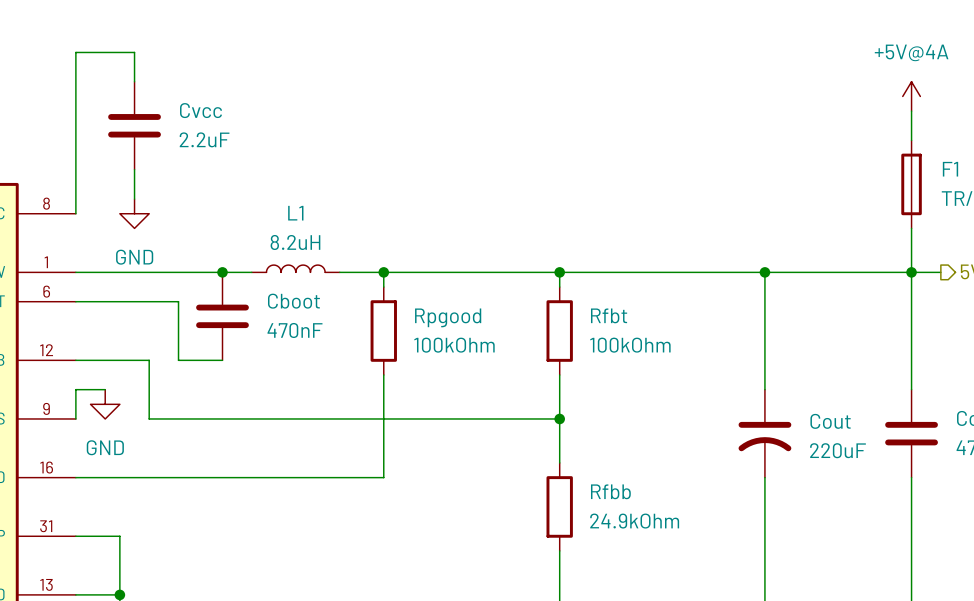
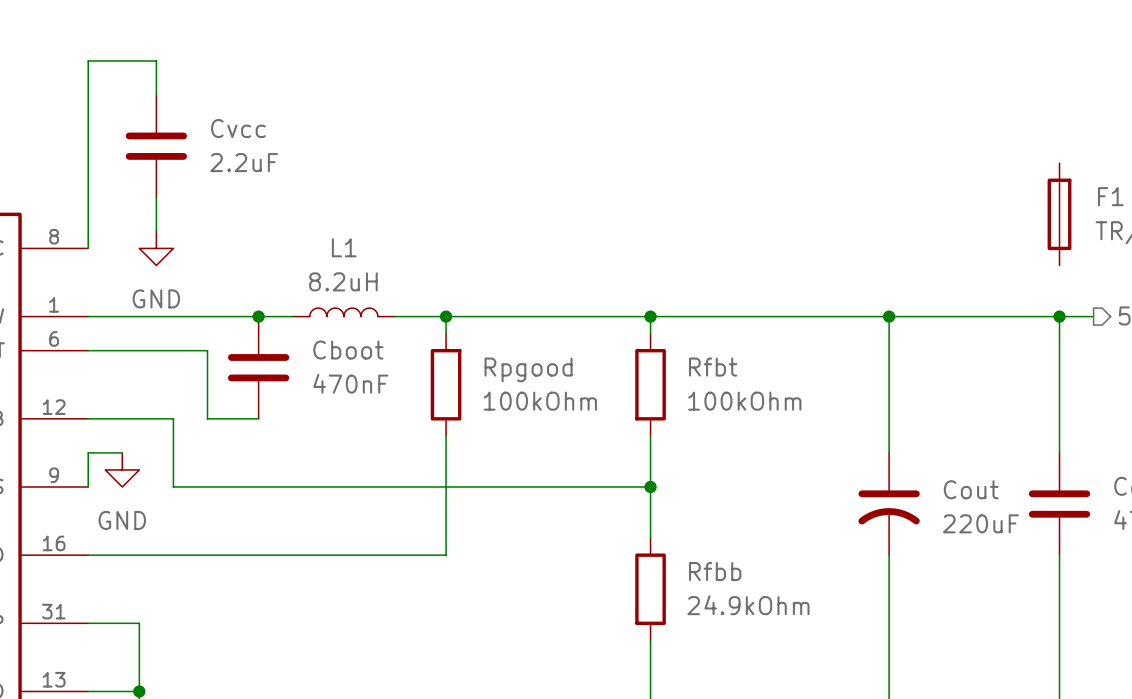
power symbol: +5V@4A (911, 96) -> none
wire: (911, 111) (911, 140) -> none
wire: (911, 228) (911, 272) -> none

